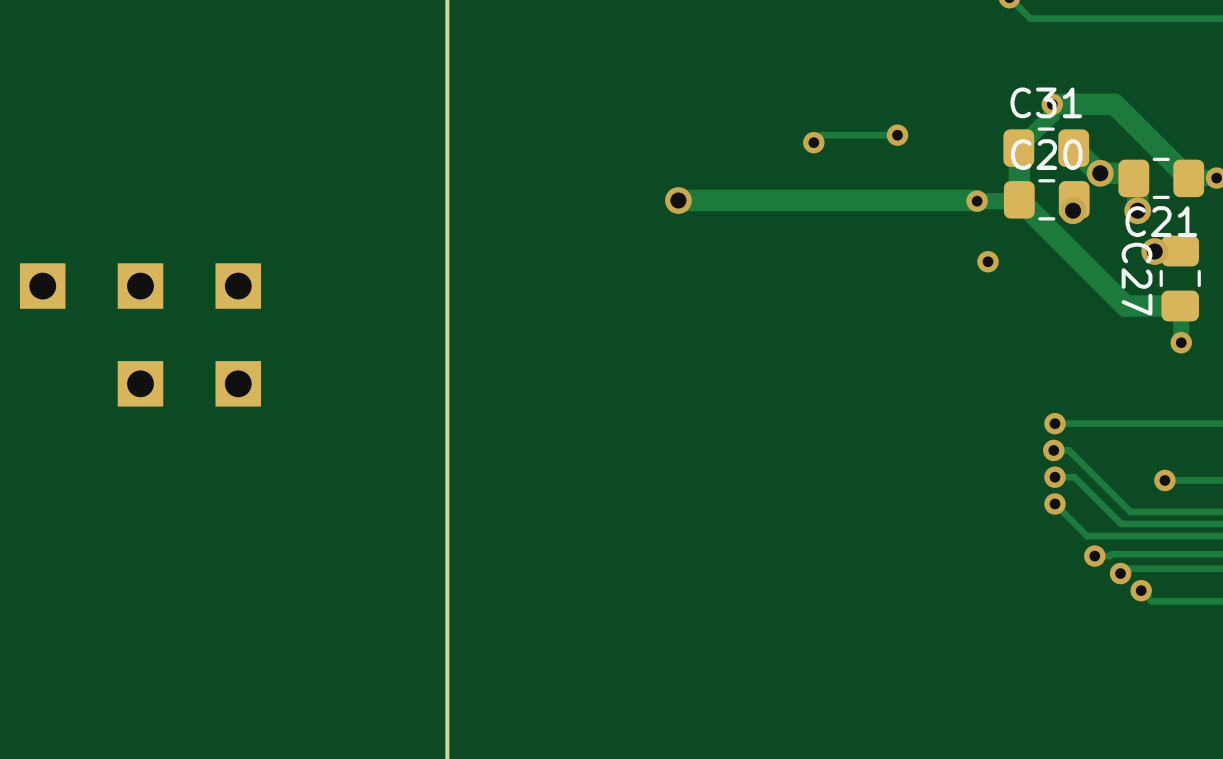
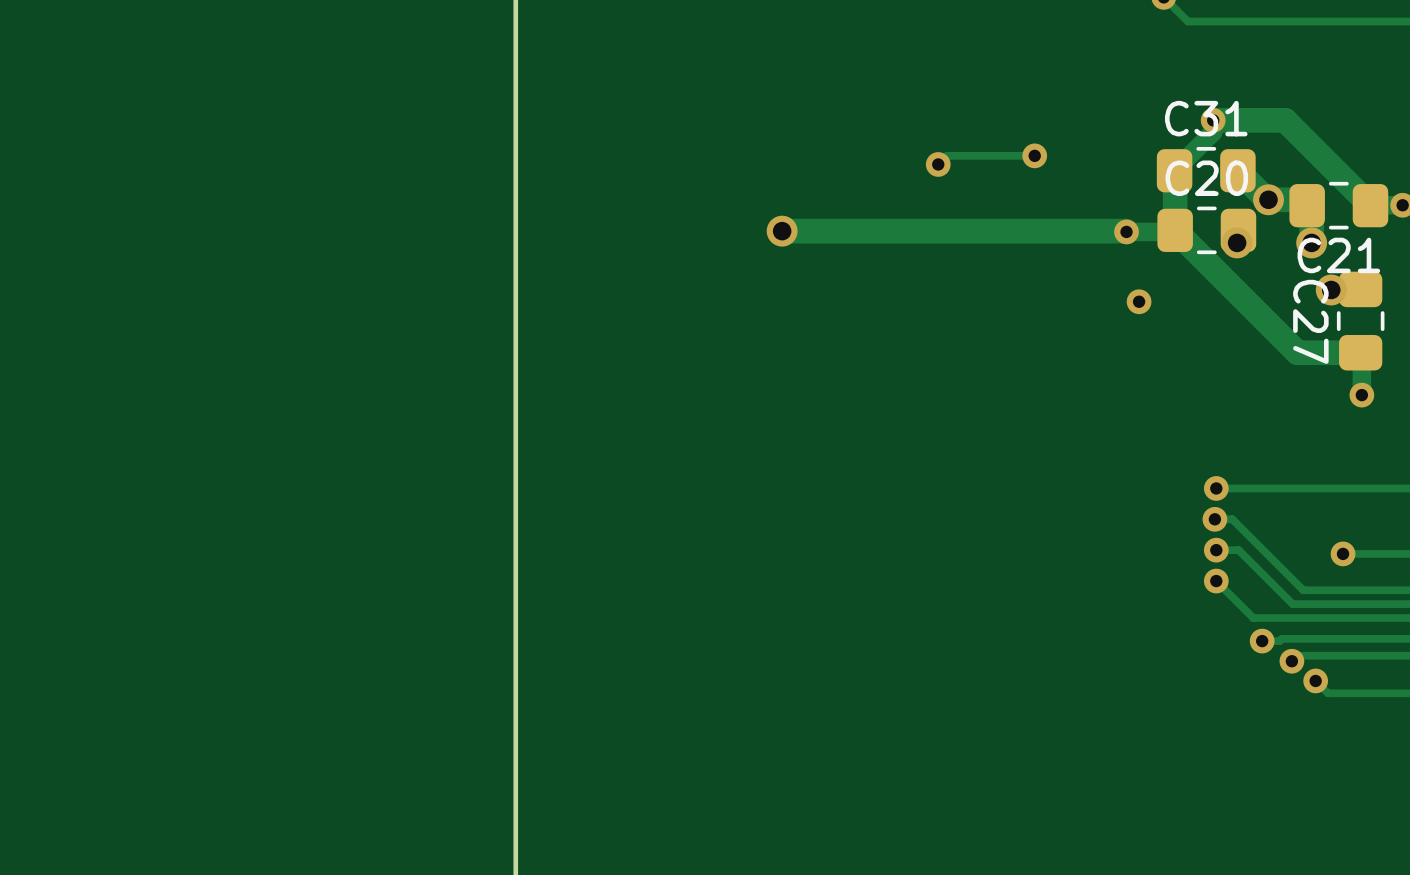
part: (42, 286) -> none
part: (140, 286) -> none
part: (238, 286) -> none
part: (140, 383) -> none
part: (238, 383) -> none

